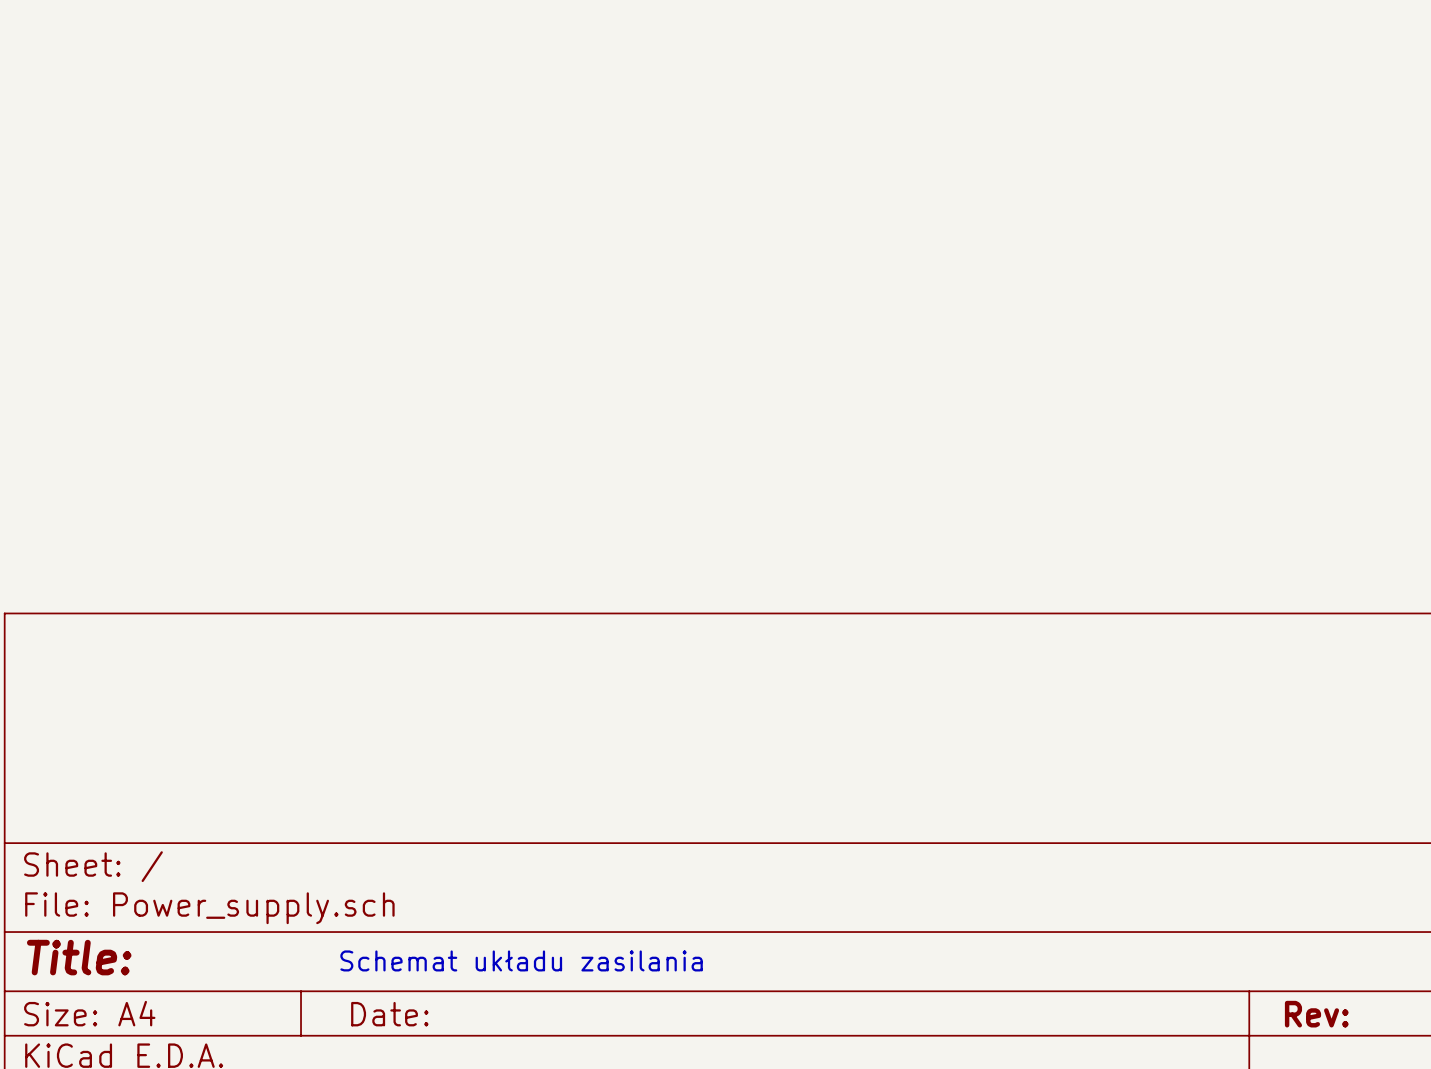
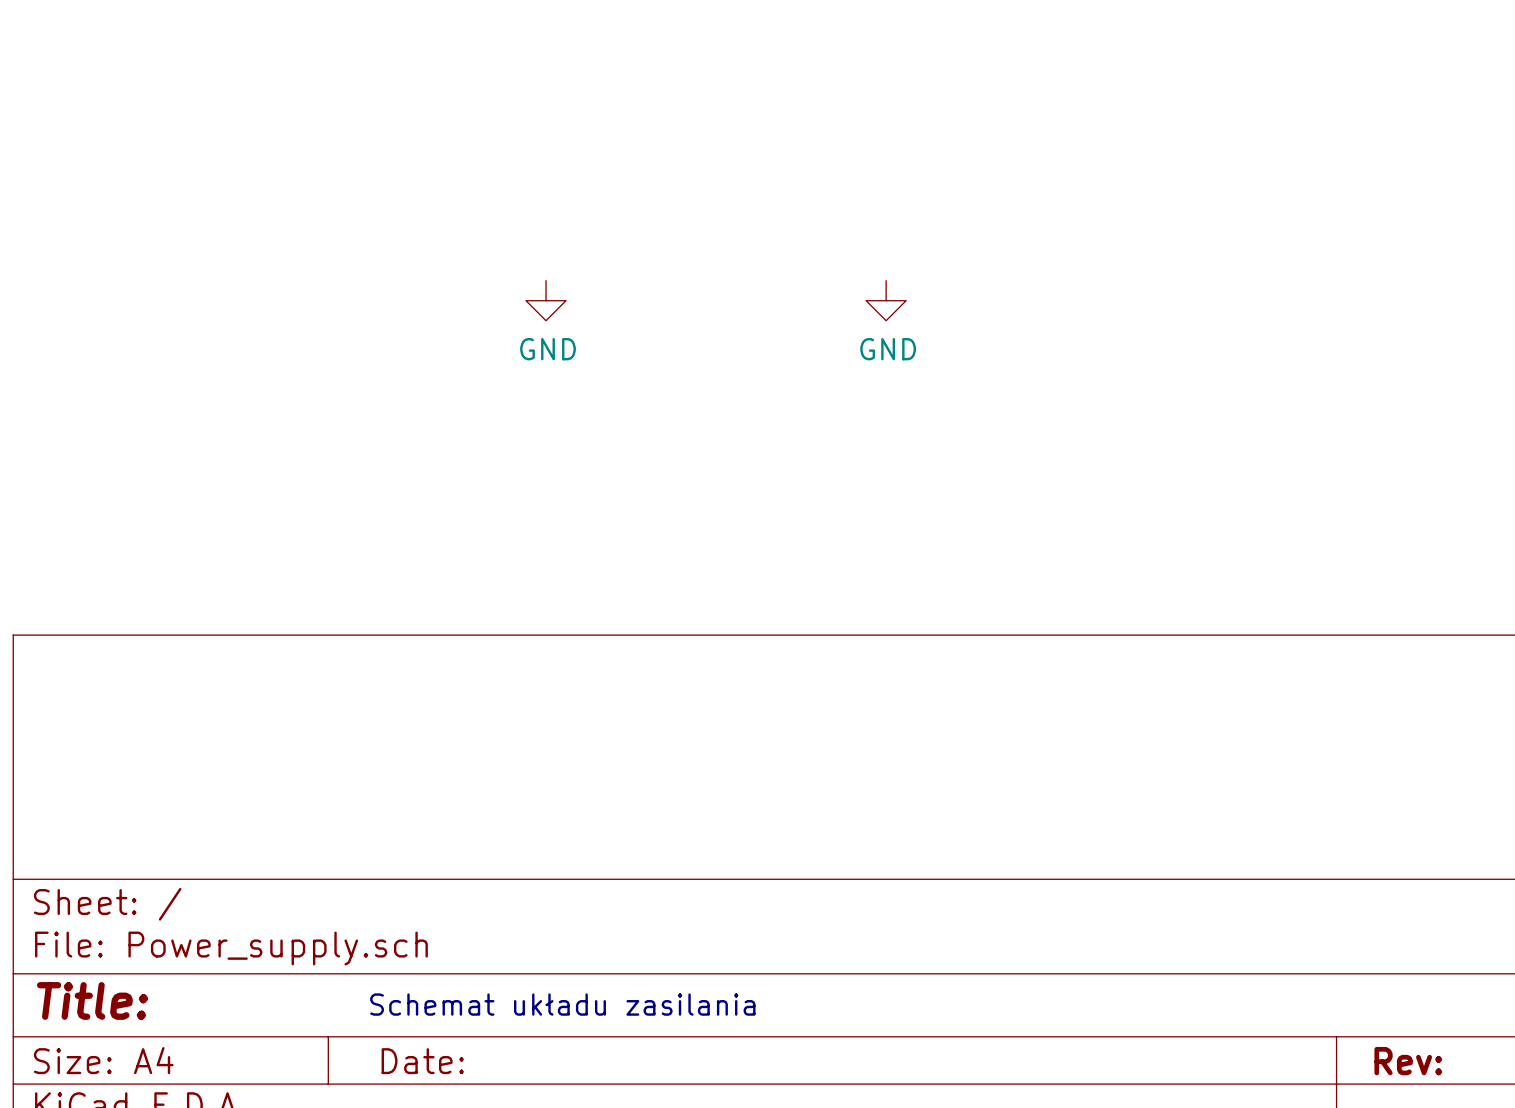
power symbol: none -> GND (546, 300)
power symbol: none -> GND (886, 300)

